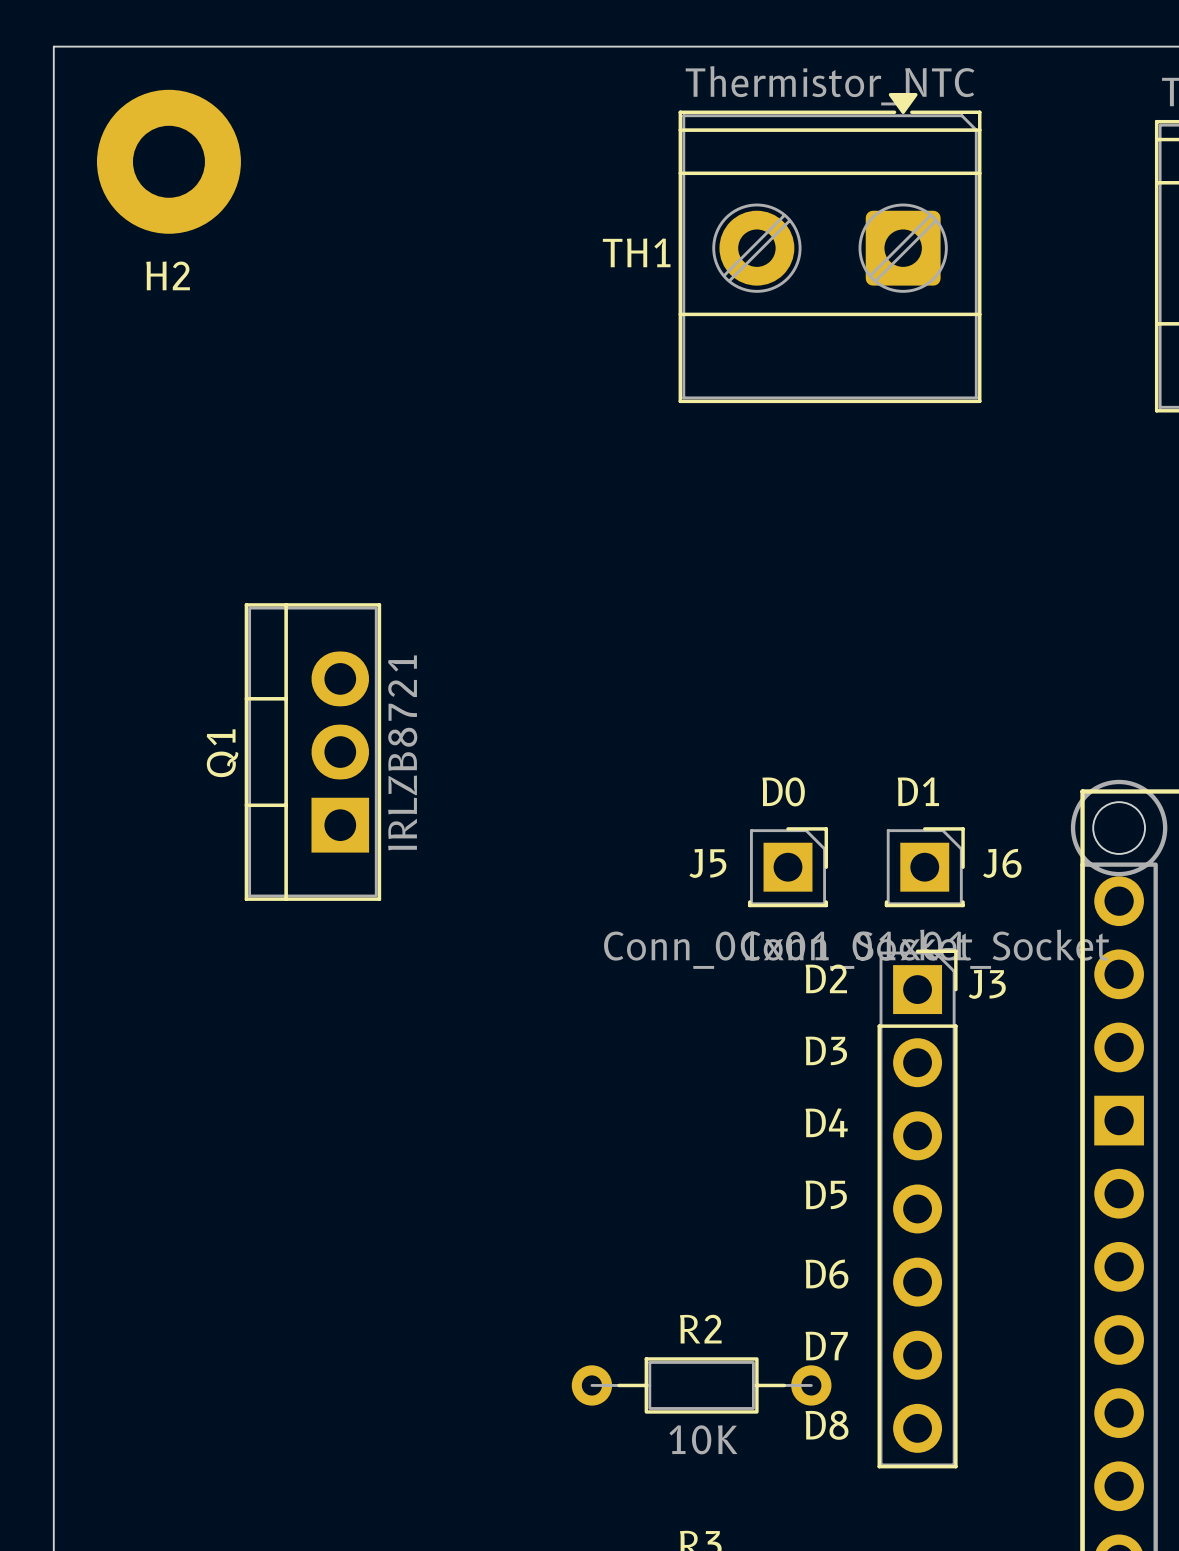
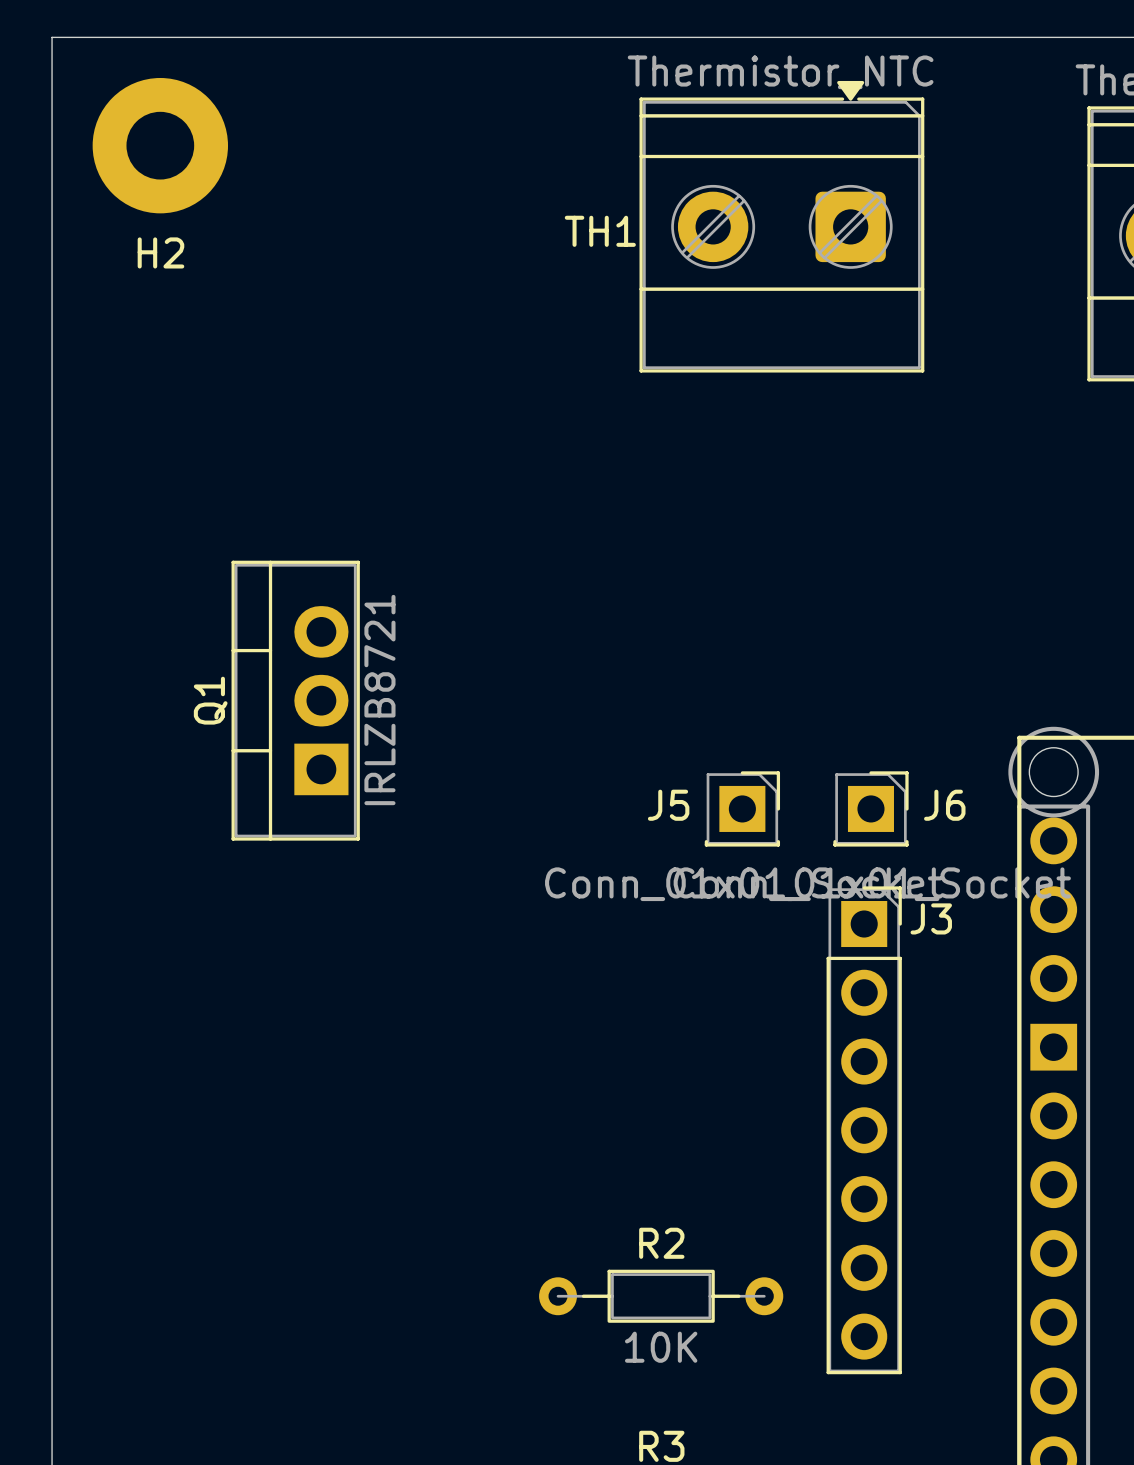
text: D0 (783, 791) -> none
text: D1 (918, 791) -> none
text: D2 (826, 978) -> none
text: D3 (826, 1050) -> none
text: D4 (826, 1122) -> none
text: D5 (826, 1194) -> none
text: D6 (826, 1274) -> none
text: D7 (826, 1346) -> none
text: D8 (827, 1425) -> none

